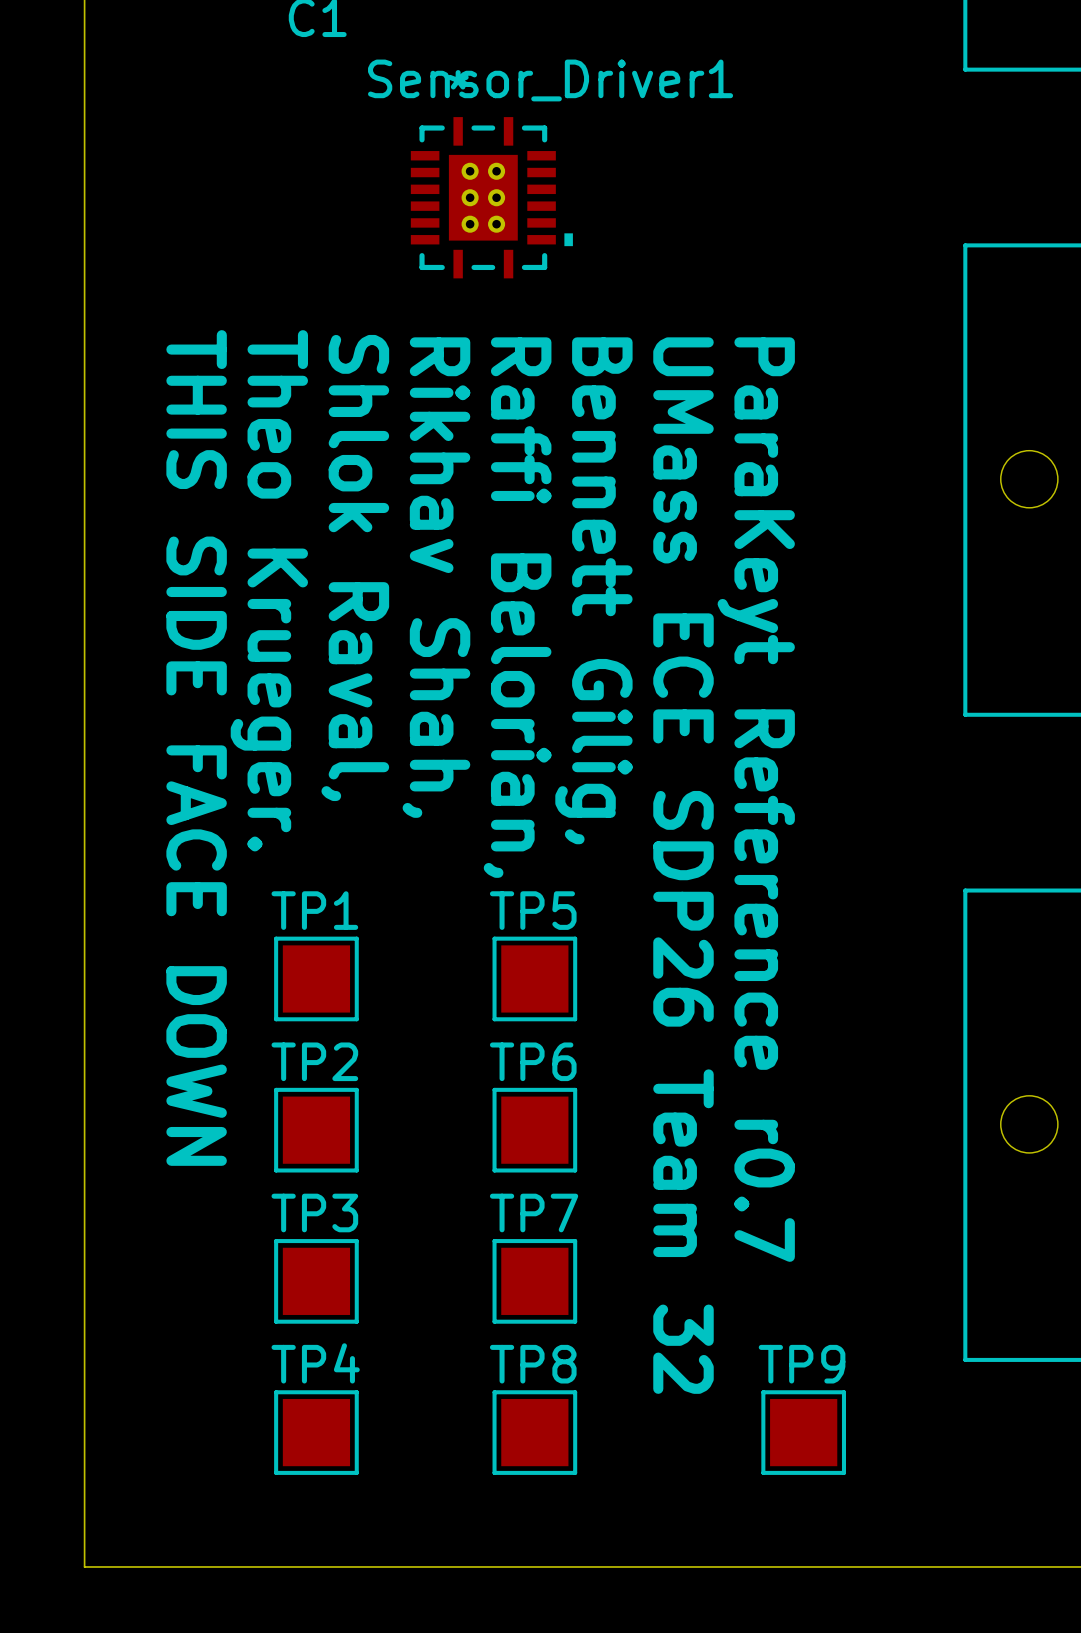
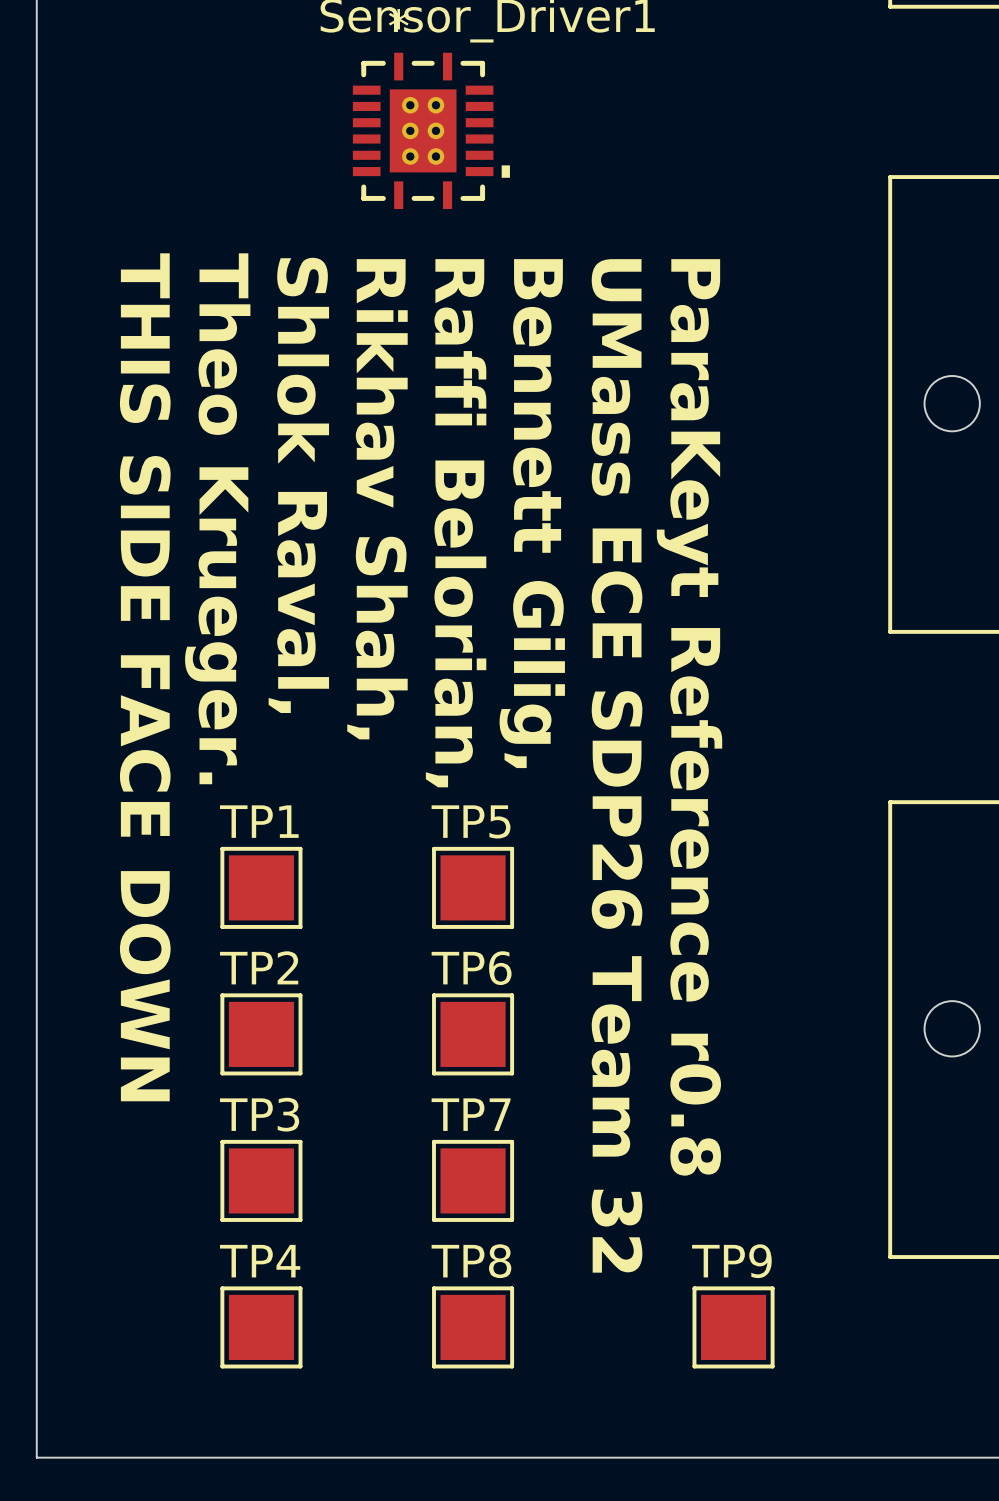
text: ParaKeyt Reference r0.7 (756, 799) -> ParaKeyt Reference r0.8 (689, 717)

